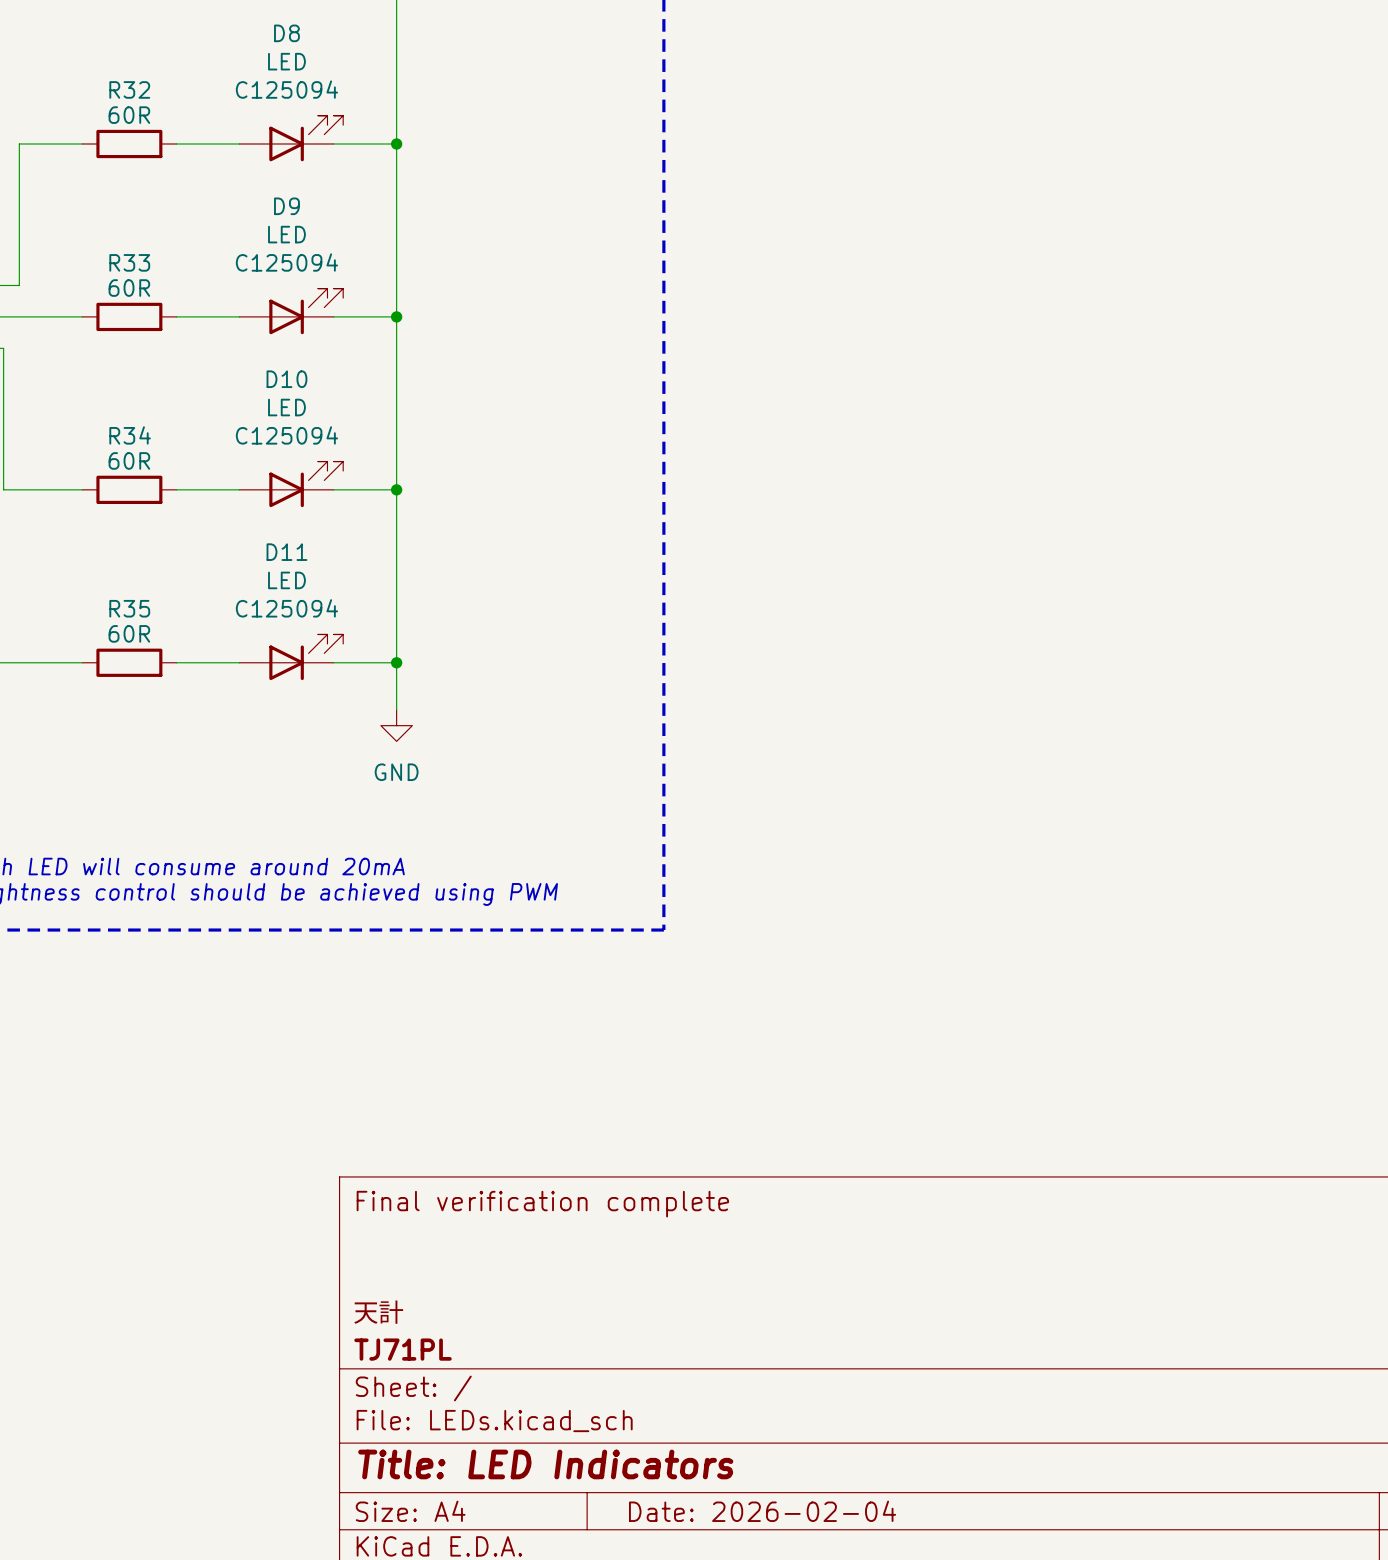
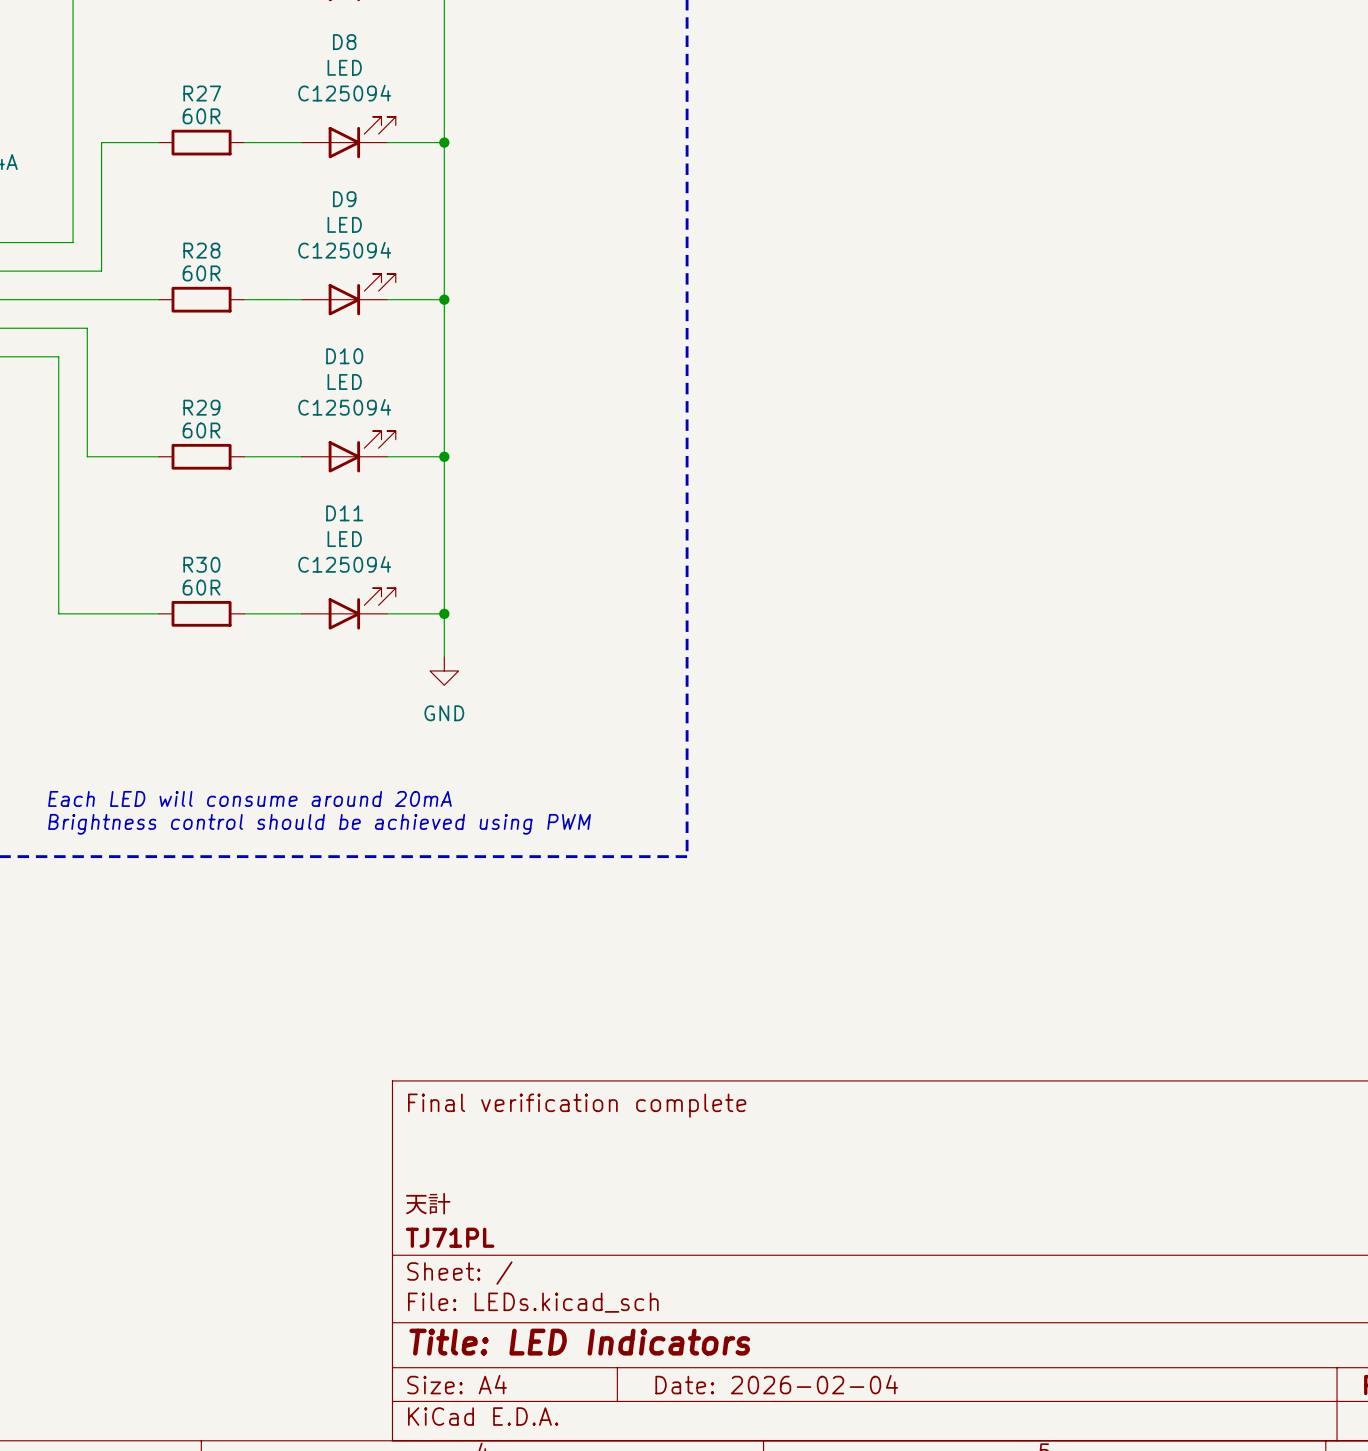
R32 name: R32 (129, 89) -> R27 (202, 93)
R33 name: R33 (129, 262) -> R28 (201, 250)
R34 name: R34 (130, 435) -> R29 (201, 407)
R35 name: R35 (129, 608) -> R30 (201, 564)

